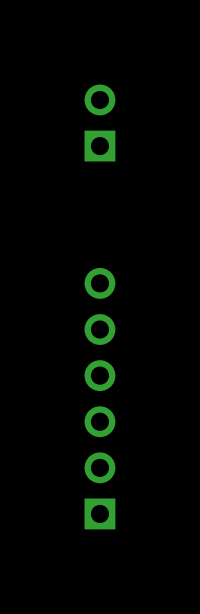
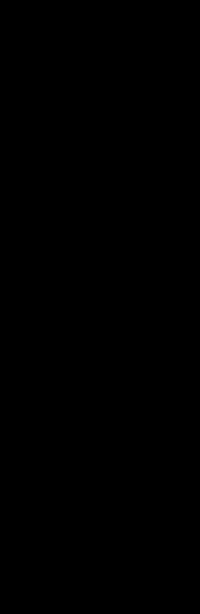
part: (99, 123) -> none
part: (99, 398) -> none

